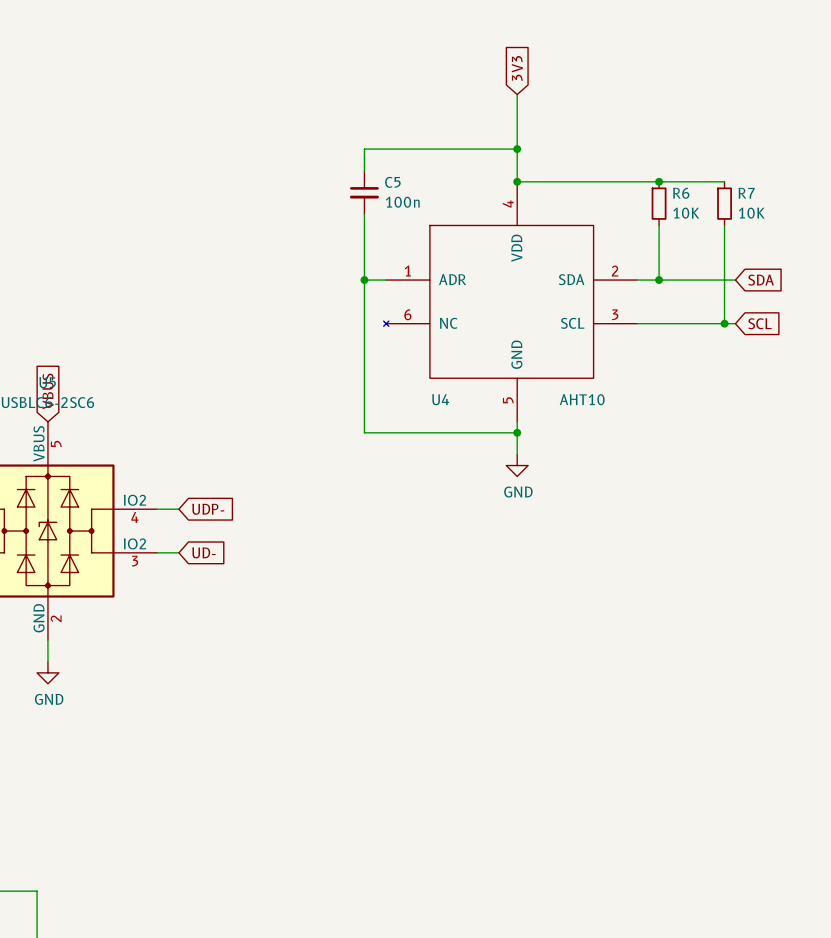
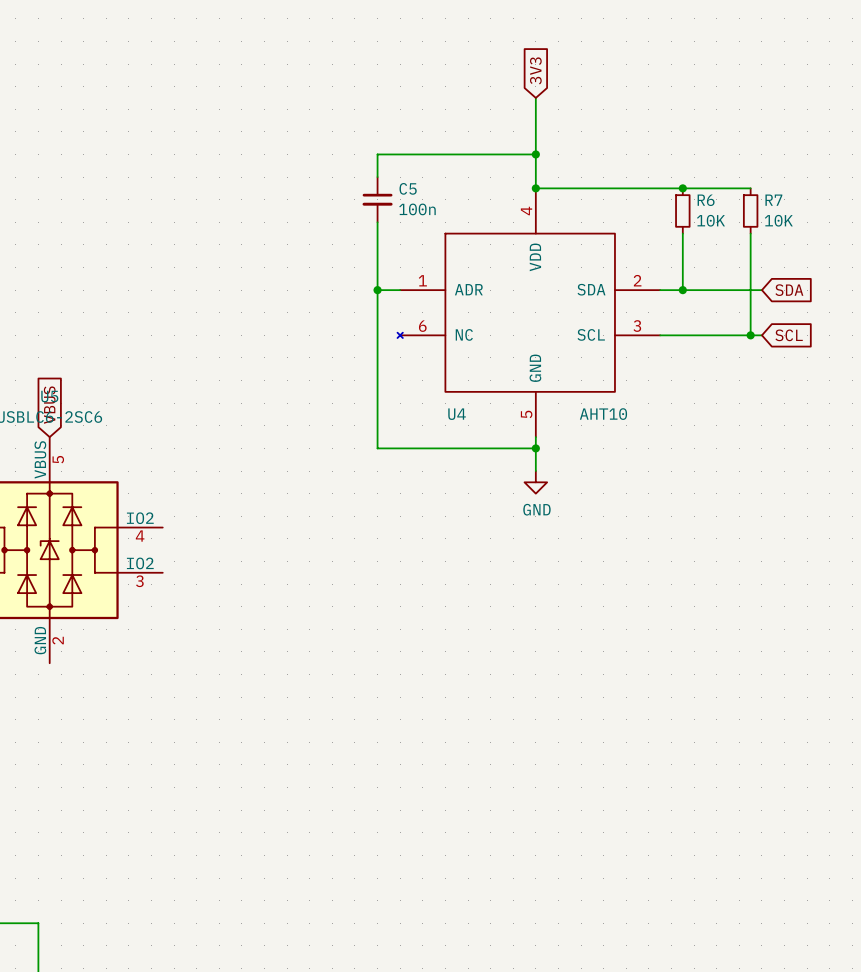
wire: (157, 509) (178, 509) -> none
global label: UDP- (208, 509) -> none
wire: (157, 552) (178, 552) -> none
global label: UD- (203, 552) -> none
wire: (47, 640) (47, 661) -> none
power symbol: GND (47, 672) -> none

